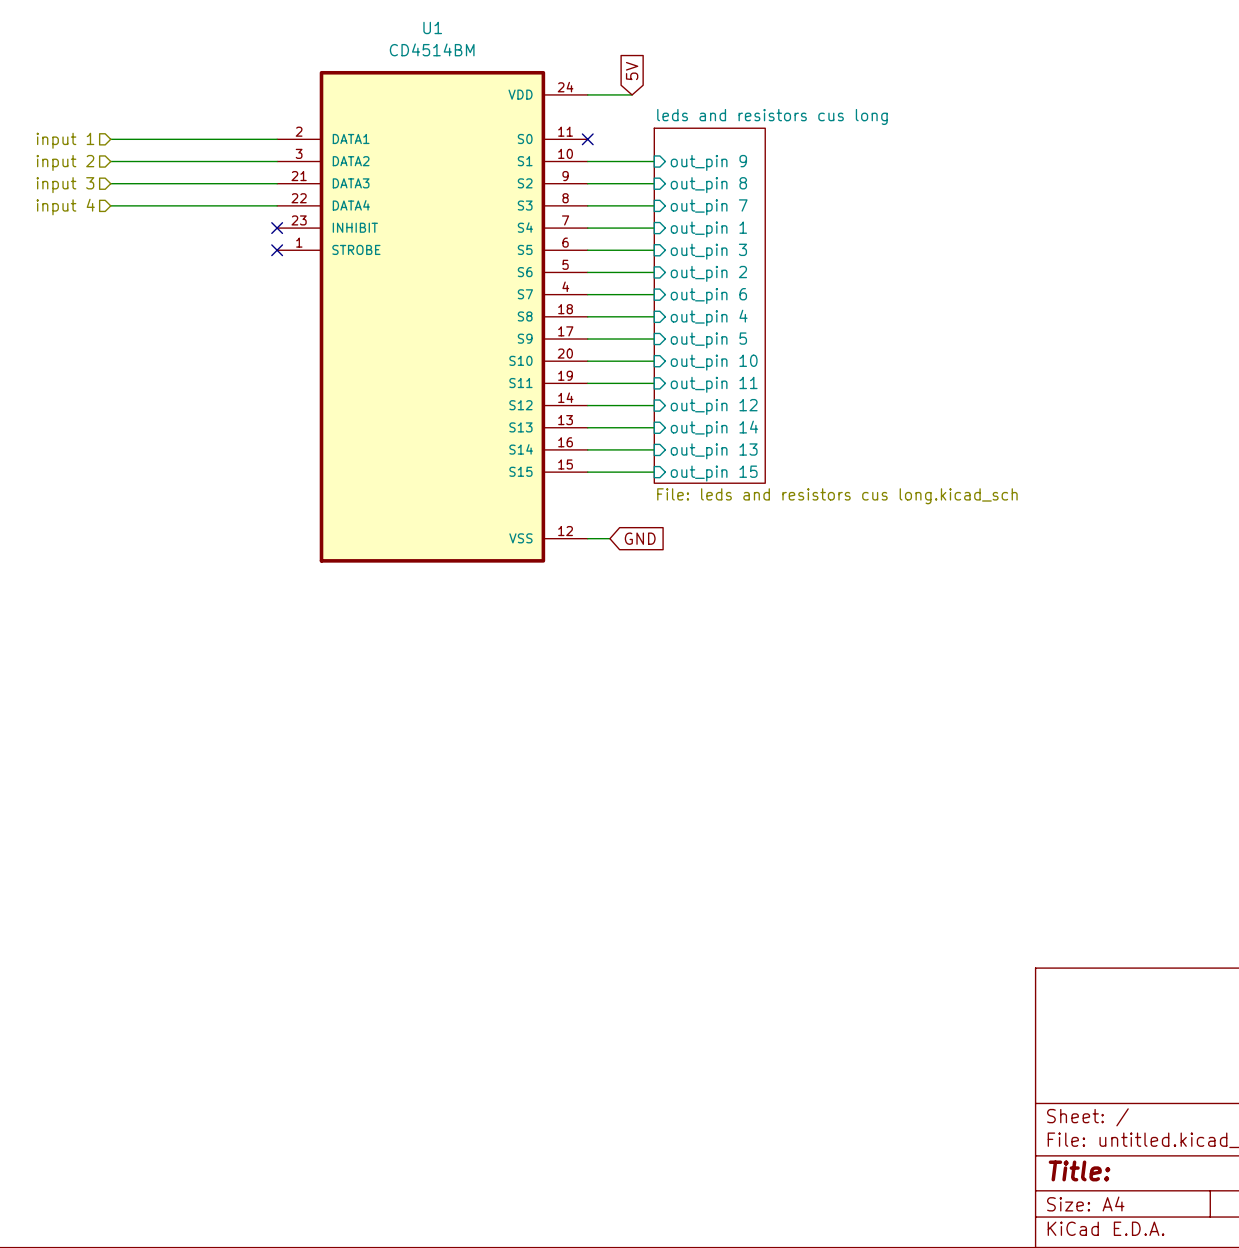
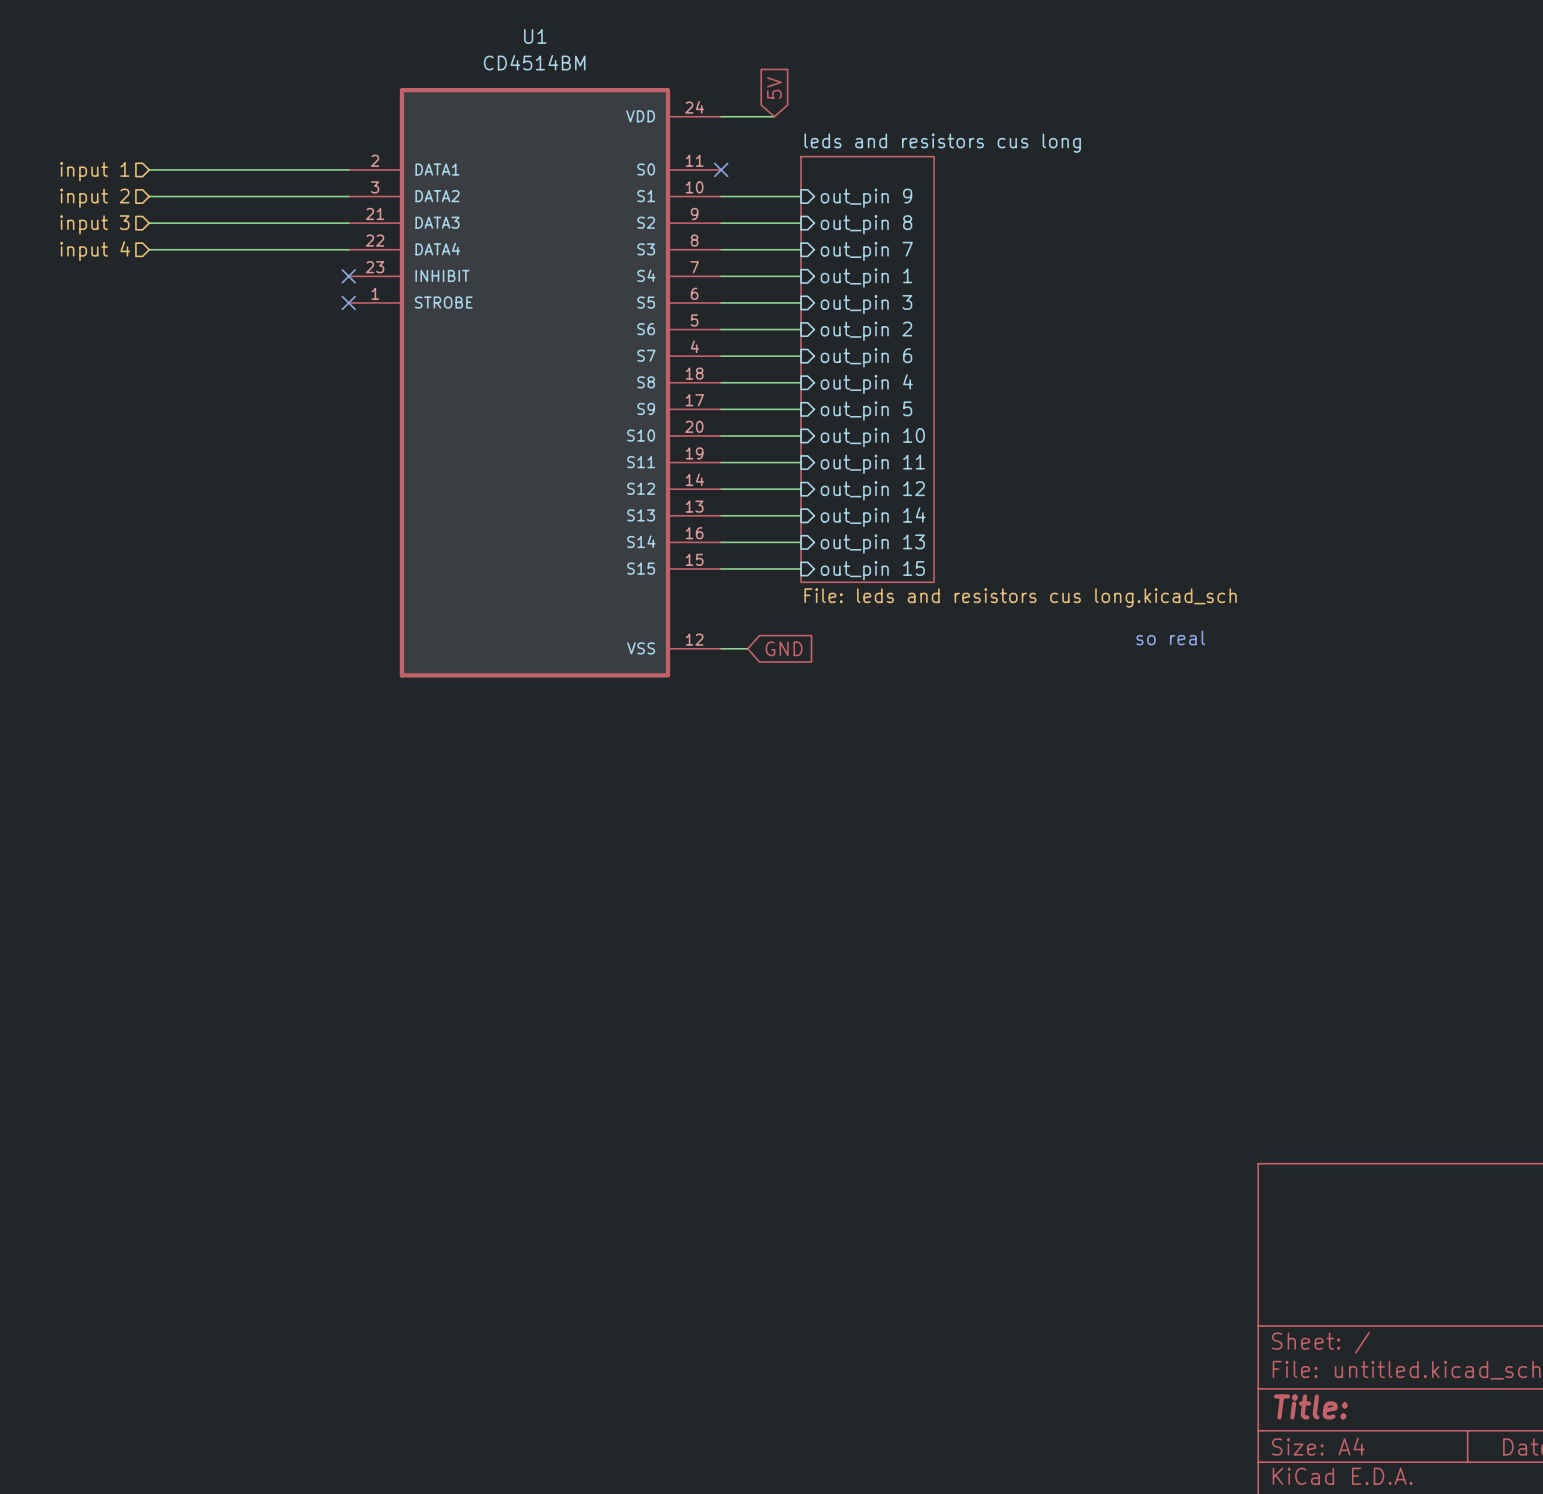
text: none -> so real (1170, 637)

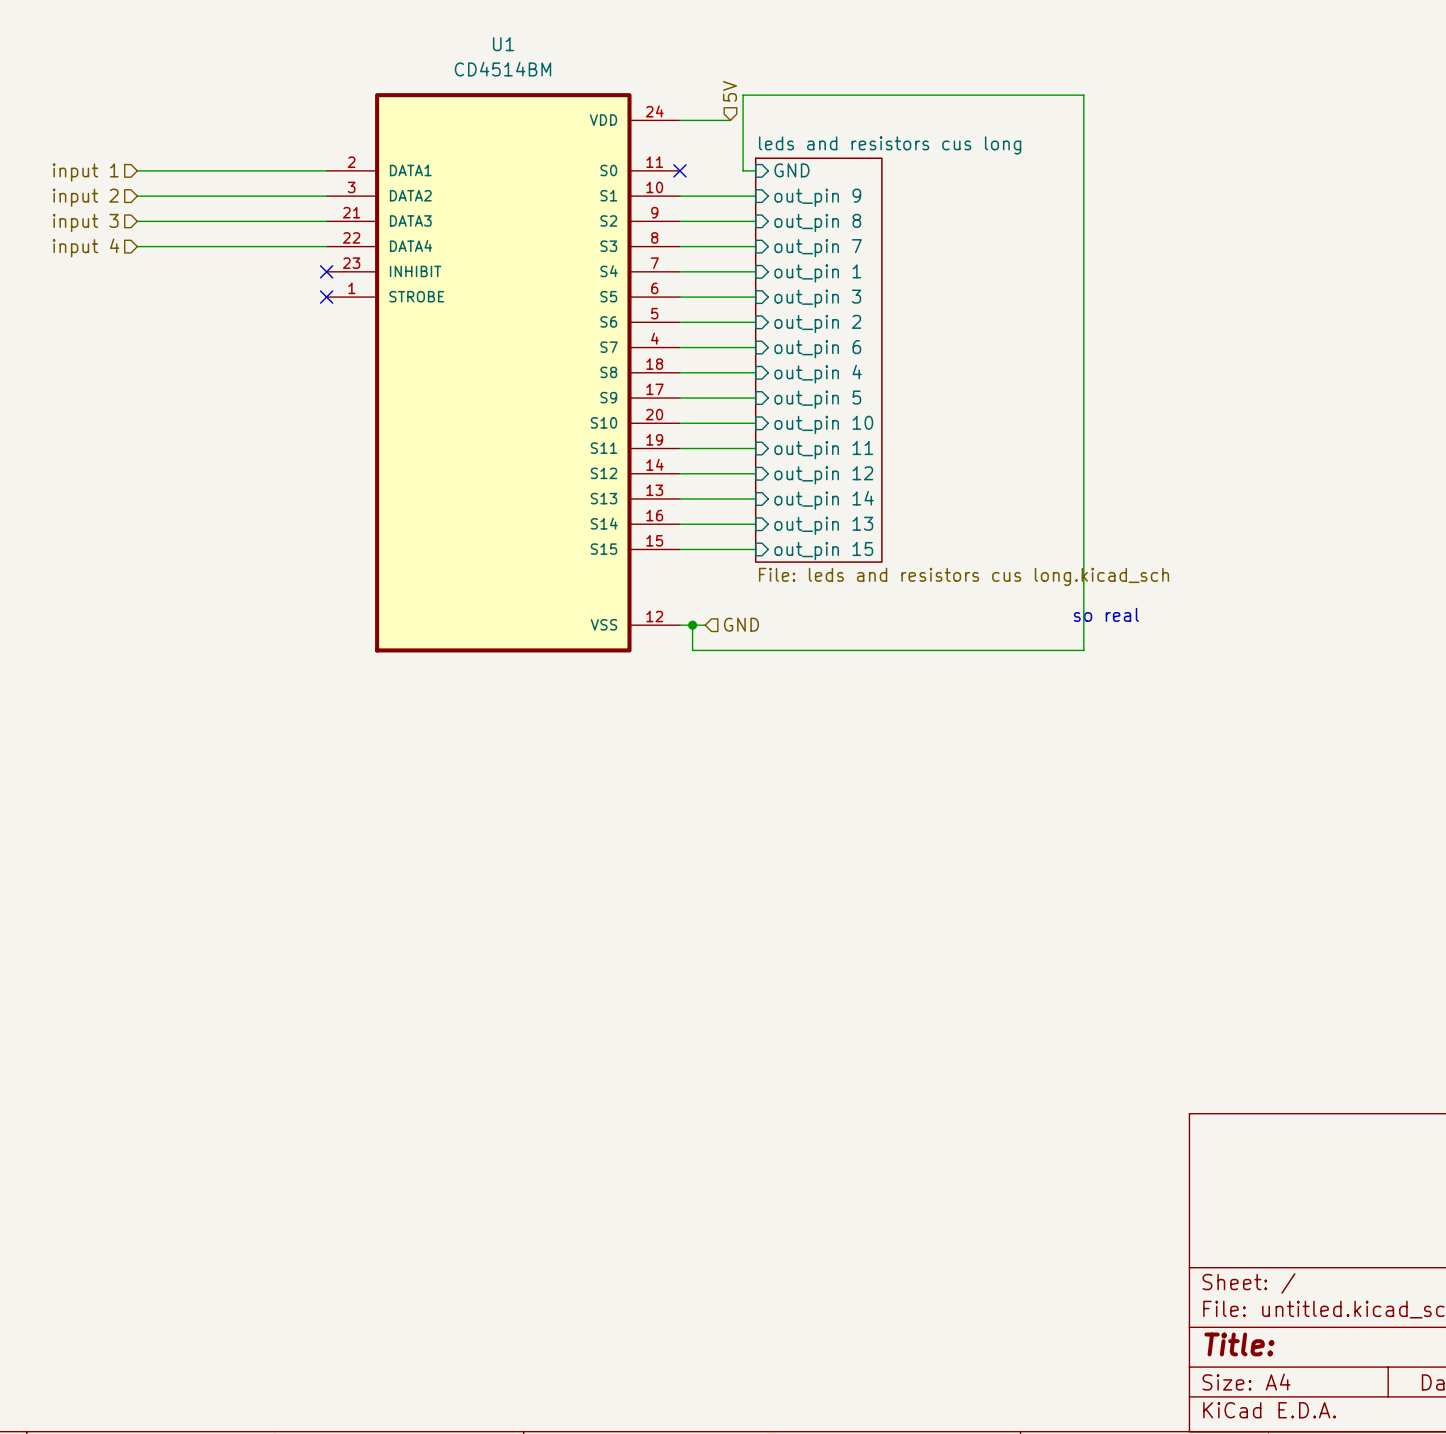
hierarchical label: none -> 5V (729, 91)
global label: 5V (774, 88) -> none
wire: none -> (755, 170) (743, 170) (743, 95) (1083, 95) (1083, 650) (692, 650) (692, 625)
sheet pin: none -> GND (791, 170)
junction: none -> (692, 625)
global label: GND (784, 648) -> none
hierarchical label: none -> GND (741, 624)

